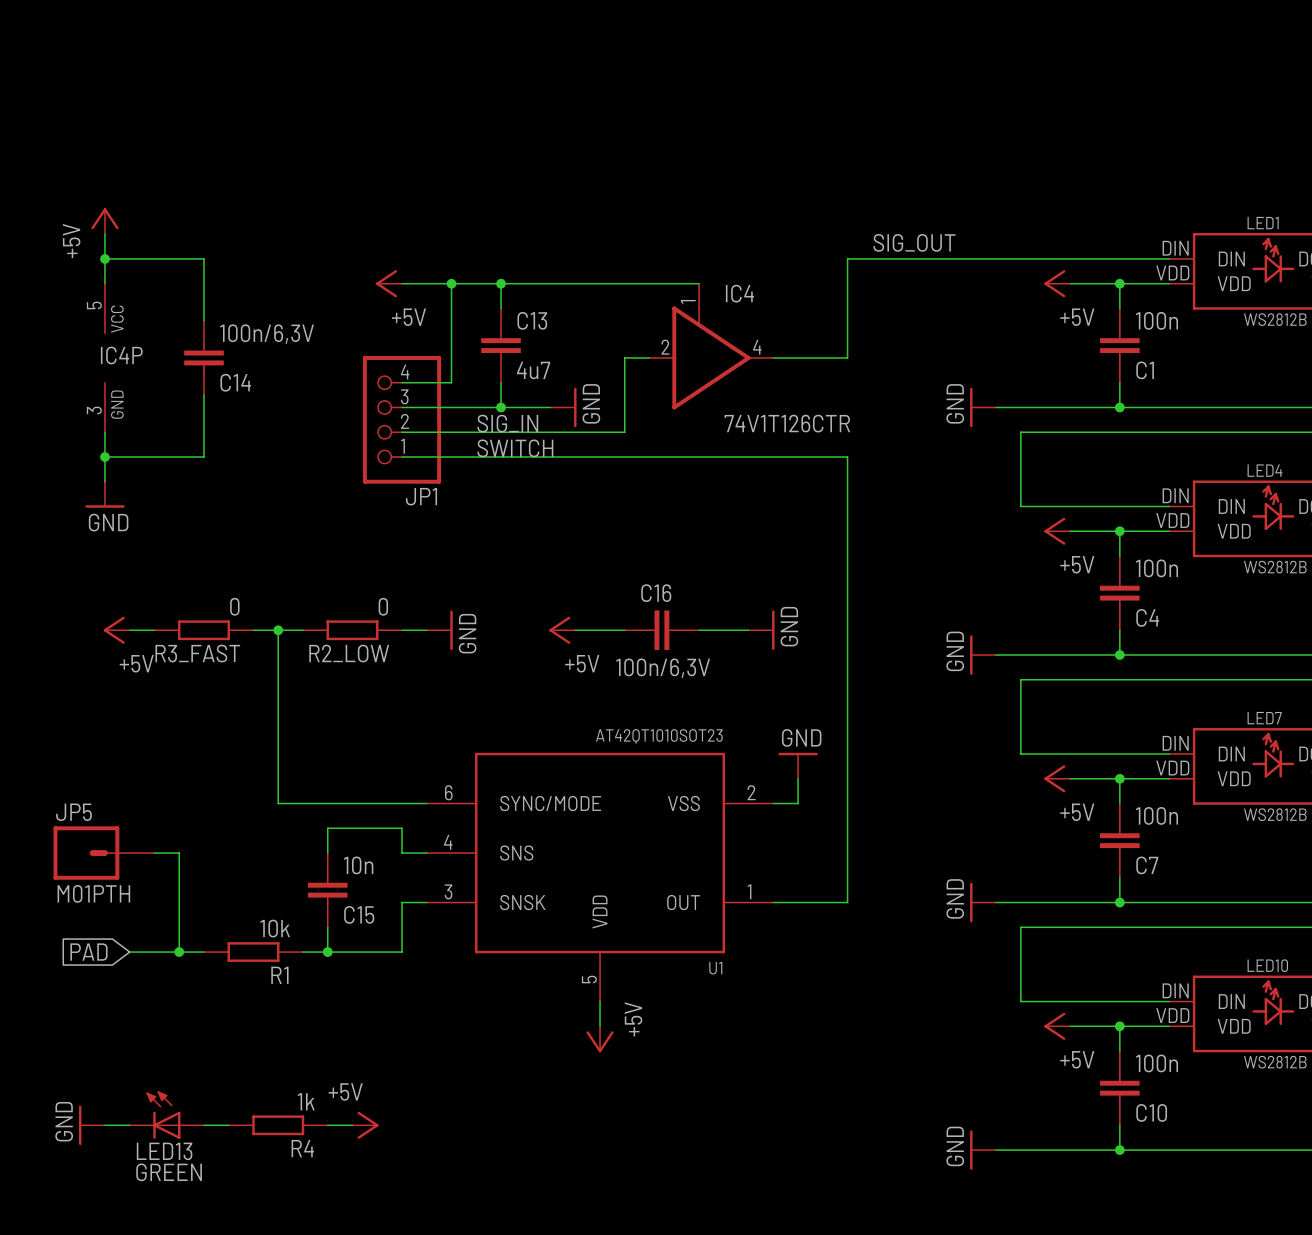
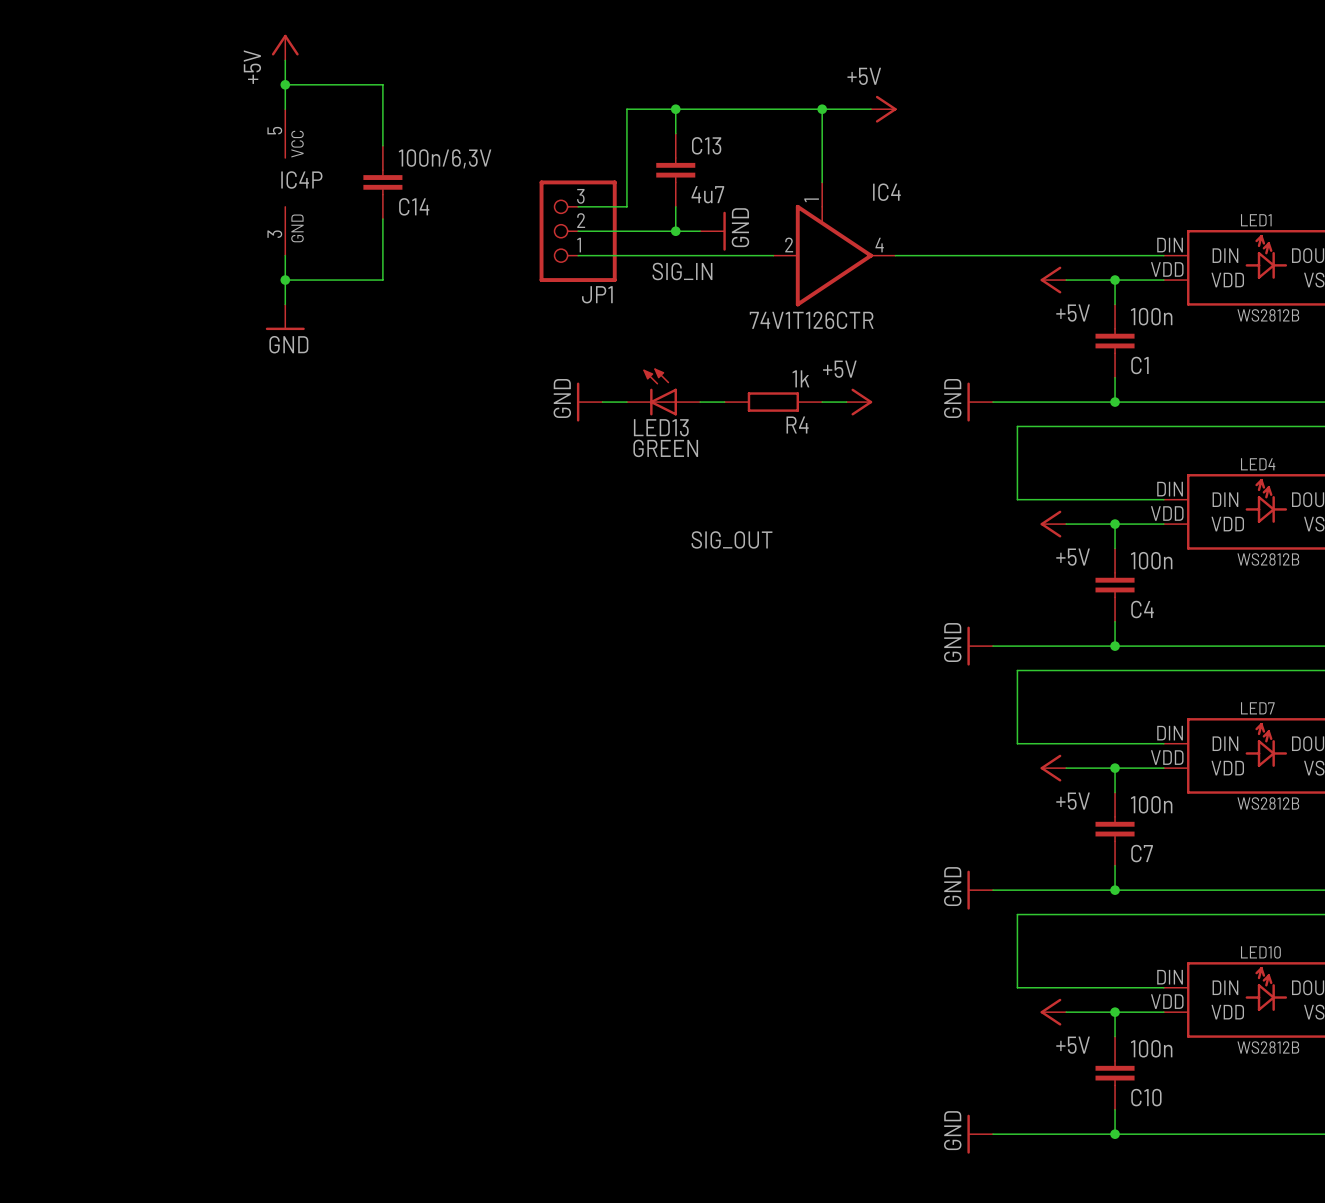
power symbol: none -> +5V (285, 47)
wire: none -> (285, 60) (285, 109)
wire: none -> (285, 84) (382, 84) (382, 145)
junction: none -> (285, 84)
wire: none -> (675, 109) (675, 133)
junction: none -> (675, 109)
wire: none -> (822, 109) (822, 182)
junction: none -> (822, 109)
wire: none -> (870, 109) (626, 109) (626, 206) (578, 206)
power symbol: none -> +5V (883, 109)
power symbol: +5V (104, 221) -> none
wire: none -> (382, 219) (382, 280) (285, 280)
wire: (104, 234) (104, 283) -> (285, 255) (285, 304)
wire: none -> (578, 231) (700, 231)
junction: none -> (675, 231)
power symbol: none -> GND (712, 231)
label: SIG_OUT (914, 242) -> none
wire: (104, 258) (203, 258) (203, 320) -> none
junction: (104, 258) -> none
wire: none -> (578, 255) (773, 255)
wire: (897, 258) (847, 258) (847, 357) (773, 357) -> none
junction: none -> (285, 280)
power symbol: +5V (389, 283) -> none
wire: (402, 283) (699, 283) -> none
wire: (451, 283) (451, 382) (402, 382) -> none
junction: (451, 283) -> none
wire: (501, 283) (501, 308) -> (675, 206) (675, 231)
junction: (501, 283) -> none
IC4 name position: IC4 (739, 293) -> IC4 (886, 192)
power symbol: none -> GND (285, 317)
C13 position: (501, 345) -> (675, 170)
IC4 position: (711, 346) -> (834, 244)
JP1 symbol: [362, 356, 442, 484] -> [539, 180, 617, 282]
IC4P position: (104, 357) -> (285, 182)
C14 position: (203, 357) -> (382, 182)
wire: (649, 357) (624, 357) (624, 432) (402, 432) -> none
wire: (501, 382) (501, 407) -> none
wire: (203, 395) (203, 456) (104, 456) -> none
wire: (402, 407) (550, 407) -> none
junction: (501, 407) -> none
power symbol rotation: 0° (575, 407) -> 180° (578, 402)
wire: none -> (602, 402) (626, 402)
wire: none -> (700, 402) (724, 402)
wire: none -> (822, 402) (846, 402)
power symbol: none -> +5V (859, 402)
label position: SIG_IN (507, 423) -> SIG_IN (682, 271)
IC4 value position: 74V1T126CTR (787, 423) -> 74V1T126CTR (811, 320)
wire: (104, 432) (104, 481) -> none
label: SWITCH (515, 448) -> none
junction: (104, 456) -> none
wire: (402, 456) (847, 456) (847, 902) (773, 902) -> none
power symbol: GND (104, 494) -> none
label: none -> SIG_OUT (731, 539)
power symbol: +5V (116, 630) -> none
wire: (129, 630) (154, 630) -> none
R3_FAST: 0 (203, 630) -> none
wire: (253, 630) (303, 630) -> none
wire: (278, 630) (278, 803) (426, 803) -> none
junction: (278, 630) -> none
R2_LOW: 0 (352, 630) -> none
wire: (402, 630) (426, 630) -> none
power symbol: GND (439, 630) -> none
power symbol: +5V (562, 630) -> none
wire: (575, 630) (624, 630) -> none
C16: 100n/6,3V (661, 630) -> none
wire: (699, 630) (748, 630) -> none
power symbol: GND (761, 630) -> none
power symbol: GND (798, 765) -> none
wire: (798, 778) (798, 803) (773, 803) -> none
JP5: M01PTH (103, 853) -> none
wire: (154, 853) (179, 853) (179, 952) -> none
wire: (327, 853) (327, 828) (402, 828) (402, 853) (426, 853) -> none
U1: AT42QT1010SOT23 (600, 877) -> none
C15: 10n (327, 890) -> none
wire: (426, 902) (402, 902) (402, 952) (303, 952) -> none
wire: (327, 927) (327, 952) -> none
global label: PAD (88, 952) -> none
wire: (129, 952) (203, 952) -> none
junction: (179, 952) -> none
R1: 10k (253, 952) -> none
junction: (327, 952) -> none
wire: (600, 1001) (600, 1026) -> none
power symbol: +5V (600, 1039) -> none
LED13 position: (166, 1115) -> (663, 391)
power symbol: GND (91, 1125) -> none
wire: (104, 1125) (129, 1125) -> none
wire: (203, 1125) (228, 1125) -> none
R4 position: (278, 1125) -> (773, 402)
wire: (327, 1125) (352, 1125) -> none
power symbol: +5V (365, 1125) -> none

